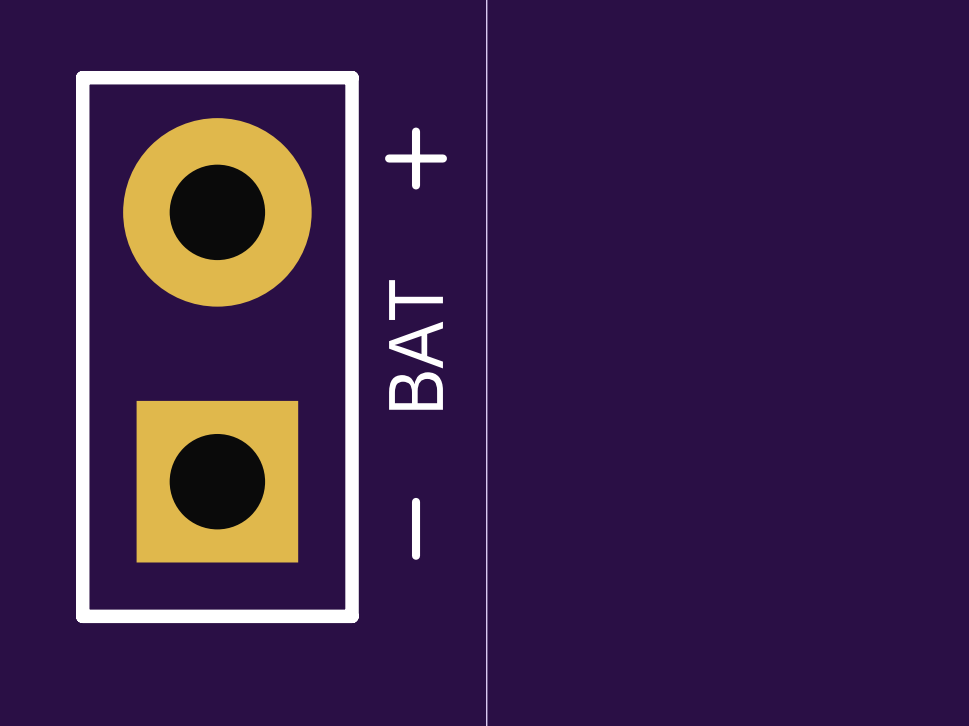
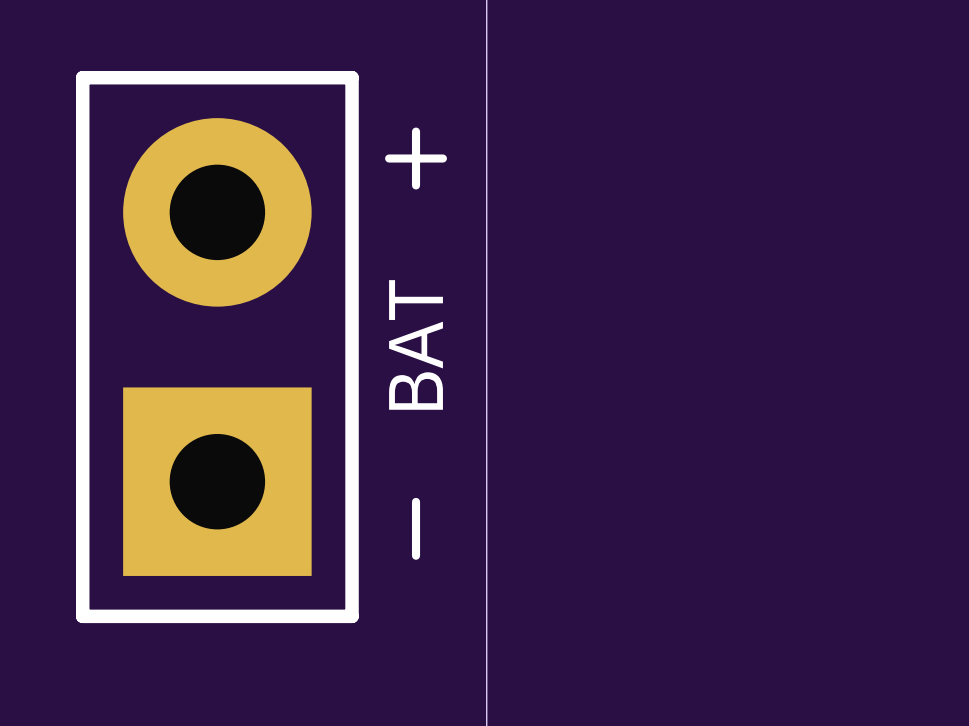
BAT footprint: [75, 70, 447, 624] -> [75, 70, 447, 624]

